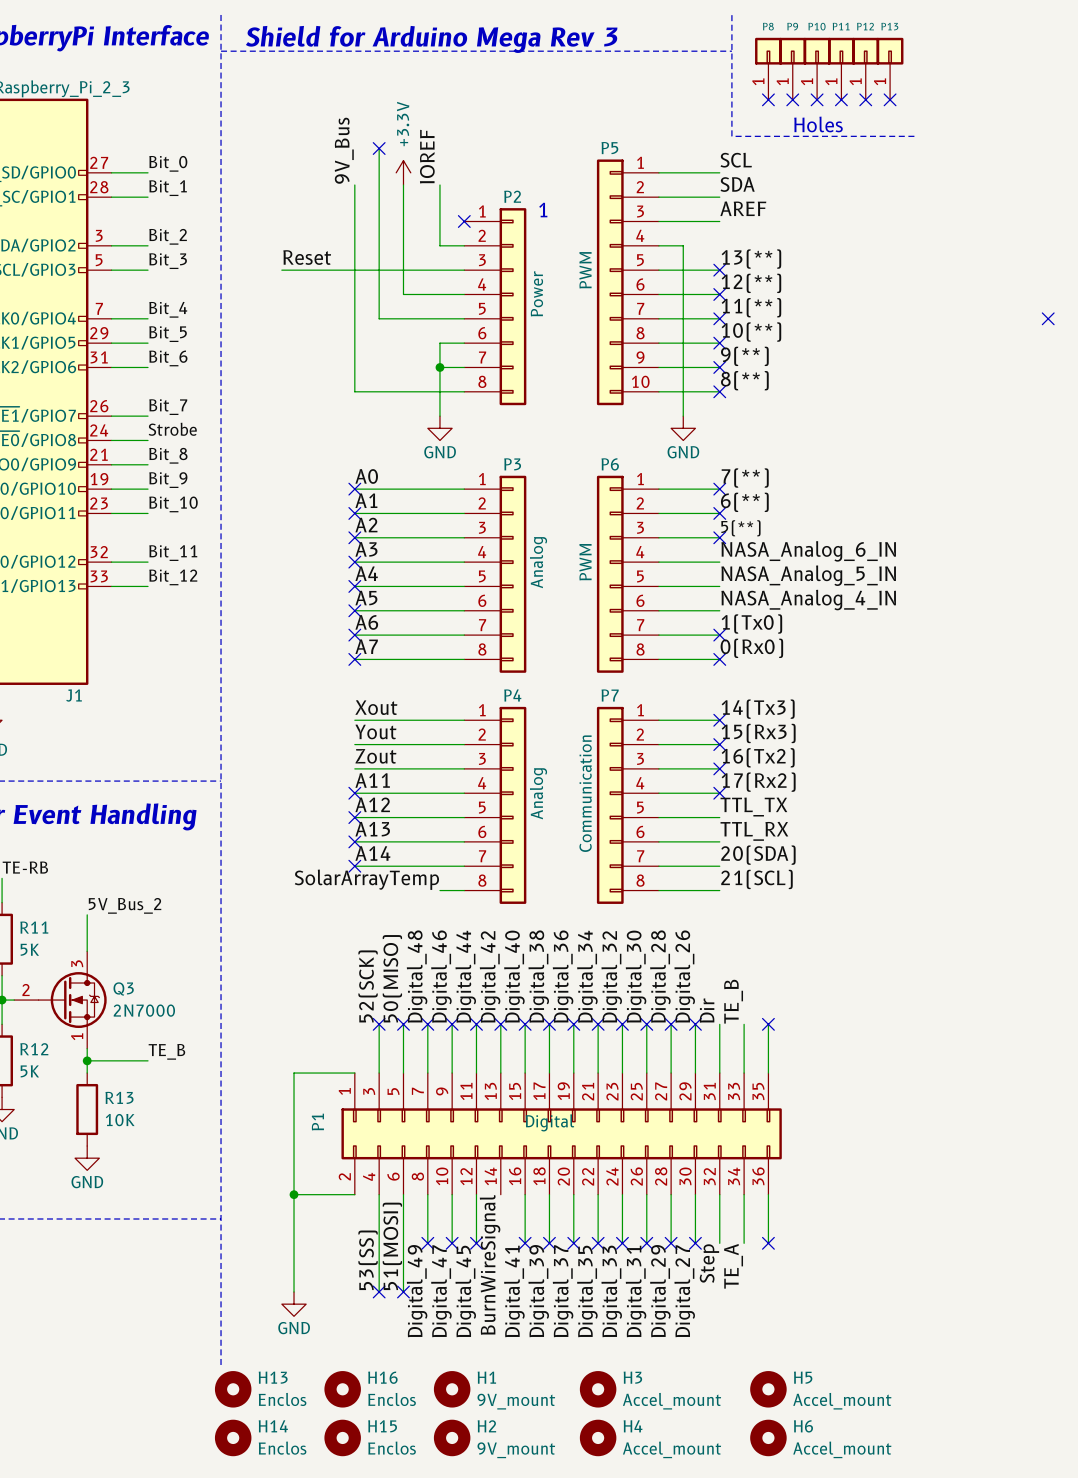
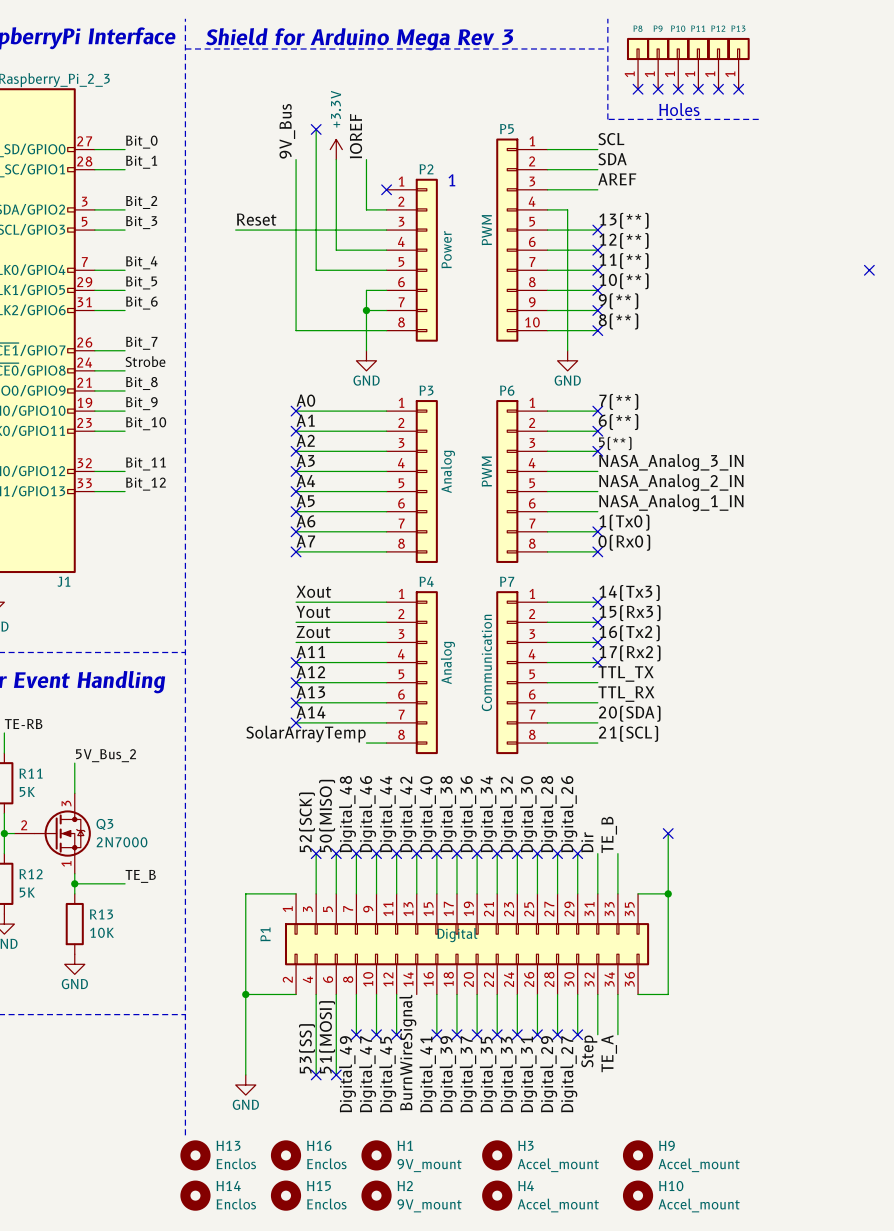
label: NASA_Analog_6_IN (808, 551) -> NASA_Analog_3_IN (671, 462)
label: NASA_Analog_5_IN (808, 575) -> NASA_Analog_2_IN (671, 482)
label: NASA_Analog_4_IN (808, 600) -> NASA_Analog_1_IN (671, 502)
wire: (768, 1024) (768, 1073) -> (668, 893) (638, 893)
no-connect mark position: (768, 1024) -> (668, 833)
junction: none -> (668, 893)
wire: (768, 1194) (768, 1243) -> (638, 994) (668, 994) (668, 833)
no-connect mark: (768, 1243) -> none
H5 name: H5 (803, 1377) -> H9 (667, 1145)
H6 name: H6 (803, 1426) -> H10 (671, 1186)

